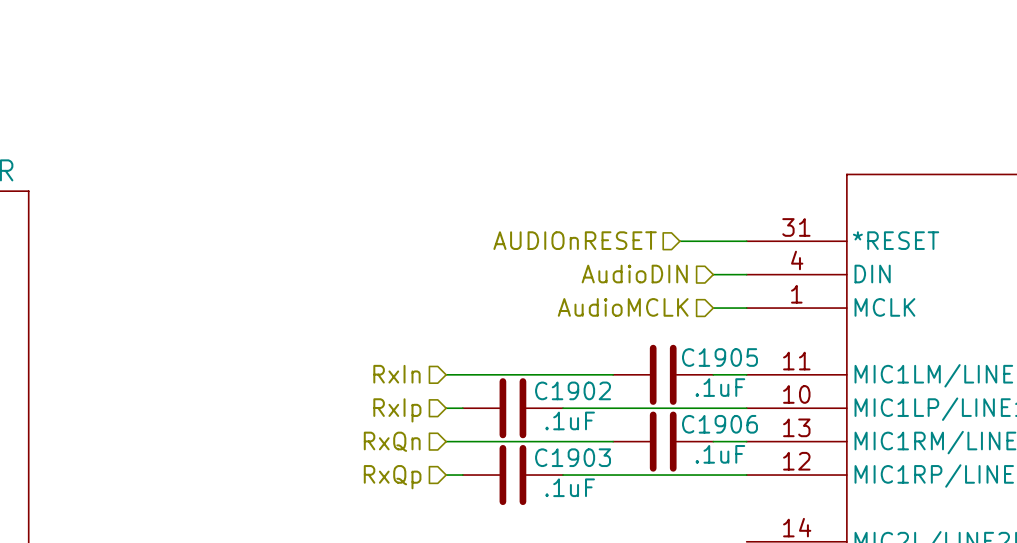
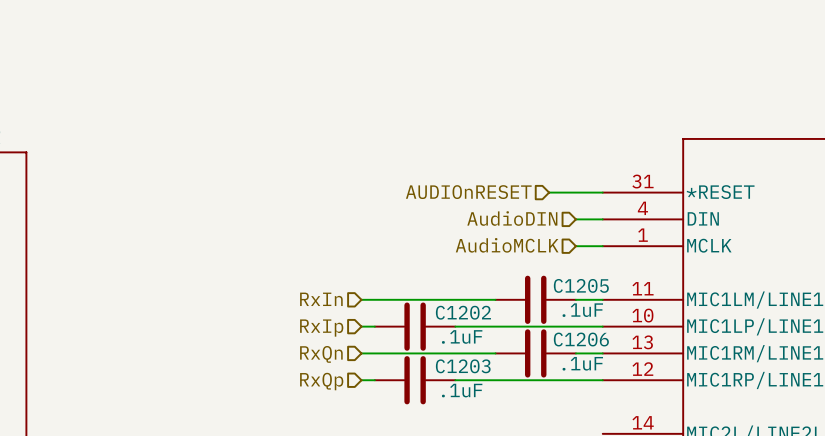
C1905 name: C1905 (719, 357) -> C1205 (581, 285)
C1902 name: C1902 (573, 390) -> C1202 (463, 312)
C1906 name: C1906 (719, 424) -> C1206 (581, 339)
C1903 name: C1903 (573, 457) -> C1203 (463, 366)

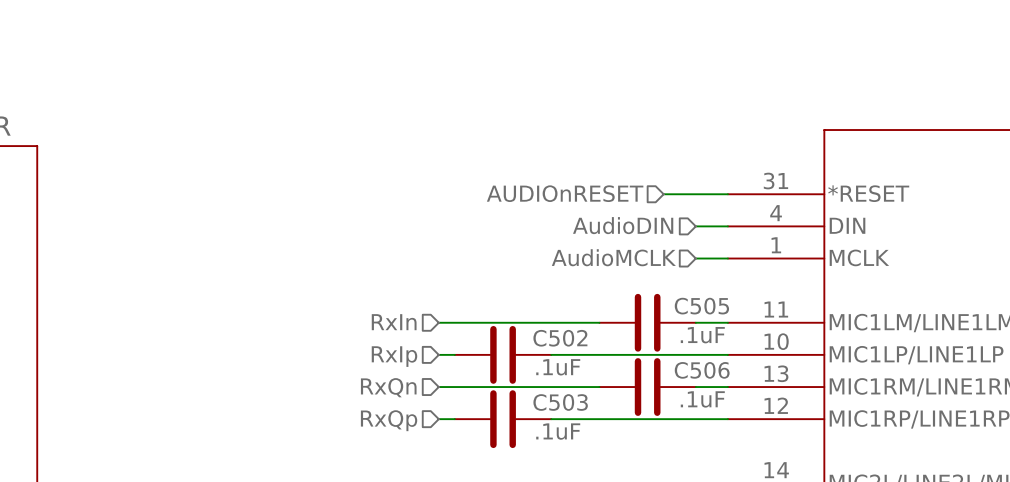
C1205 name: C1205 (581, 285) -> C505 (701, 306)
C1202 name: C1202 (463, 312) -> C502 (560, 338)
C1206 name: C1206 (581, 339) -> C506 (702, 370)
C1203 name: C1203 (463, 366) -> C503 (560, 402)

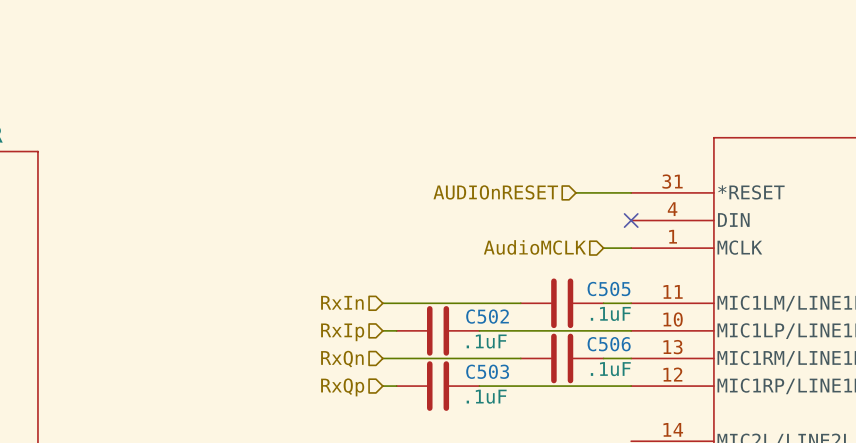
hierarchical label: AudioDIN (623, 225) -> none
wire: (695, 226) (727, 226) -> none
no-connect mark: none -> (631, 220)

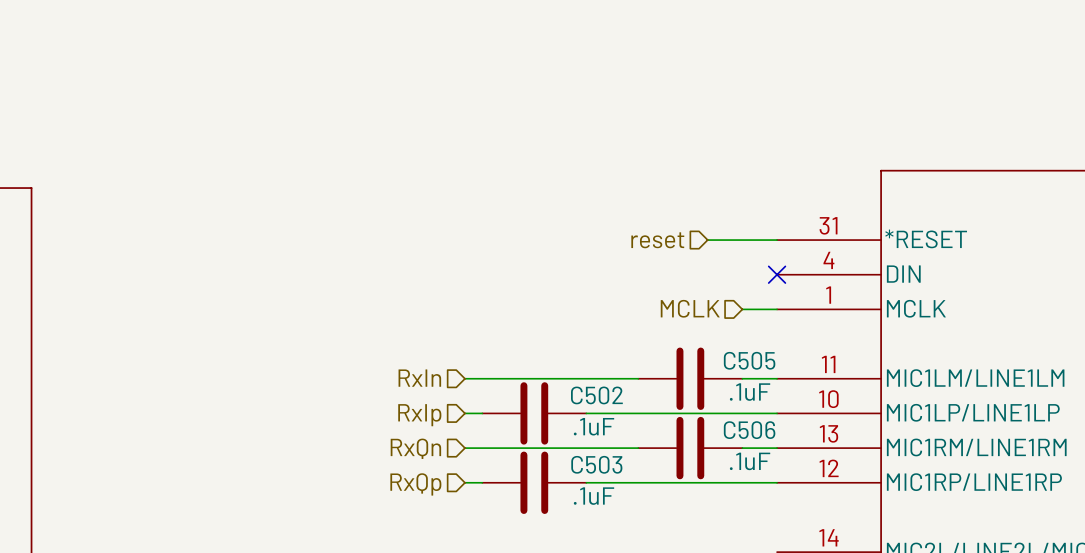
hierarchical label: AUDIOnRESET (495, 192) -> reset (657, 240)
hierarchical label: AudioMCLK (534, 247) -> MCLK (690, 308)

